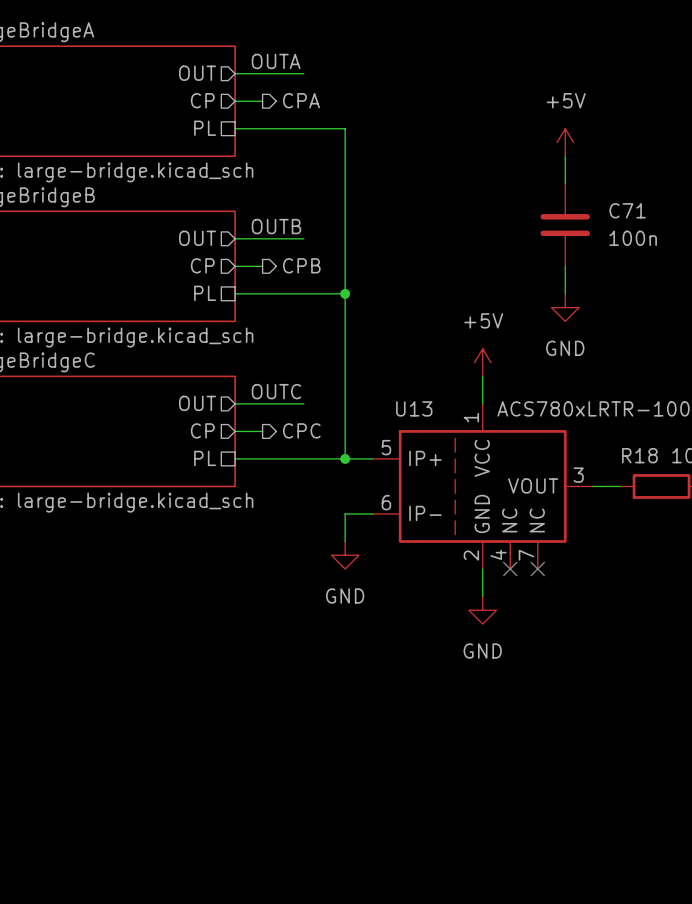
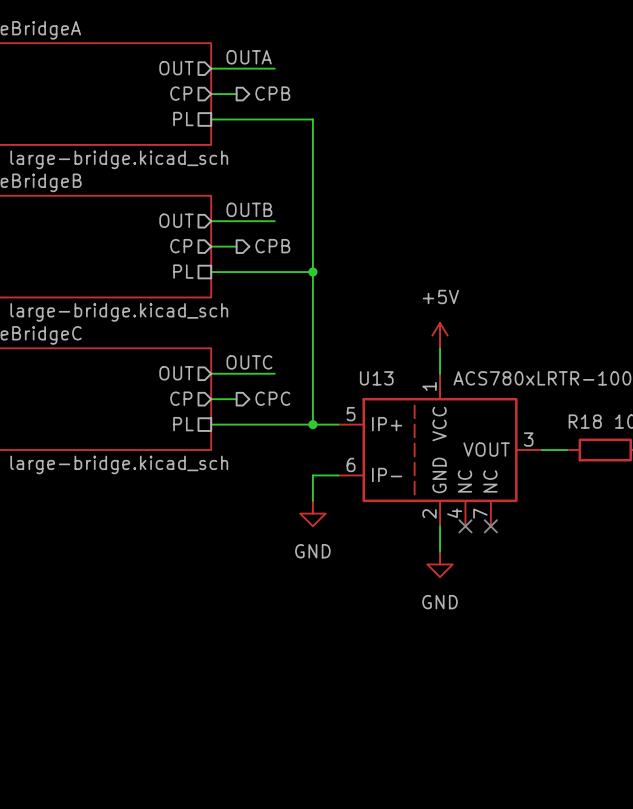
hierarchical label: CPA (301, 100) -> CPB (272, 93)
power symbol: +5V (565, 142) -> none
wire: (565, 156) (565, 183) -> none
C71: 100n (565, 225) -> none
wire: (565, 266) (565, 293) -> none
power symbol: GND (565, 307) -> none

